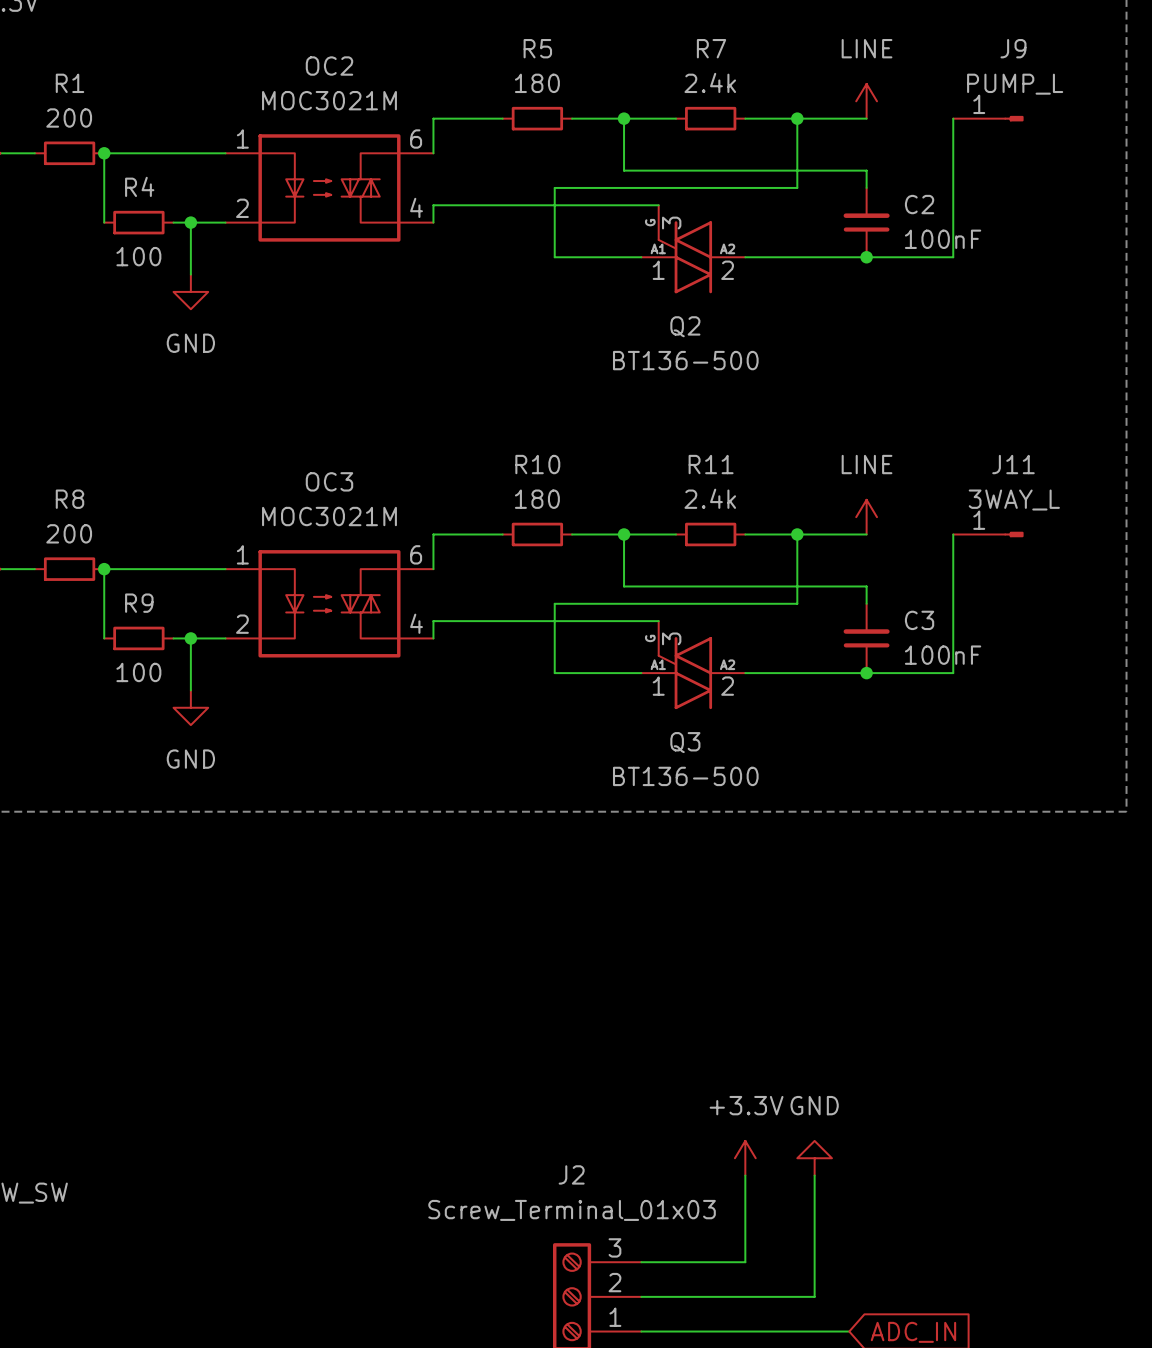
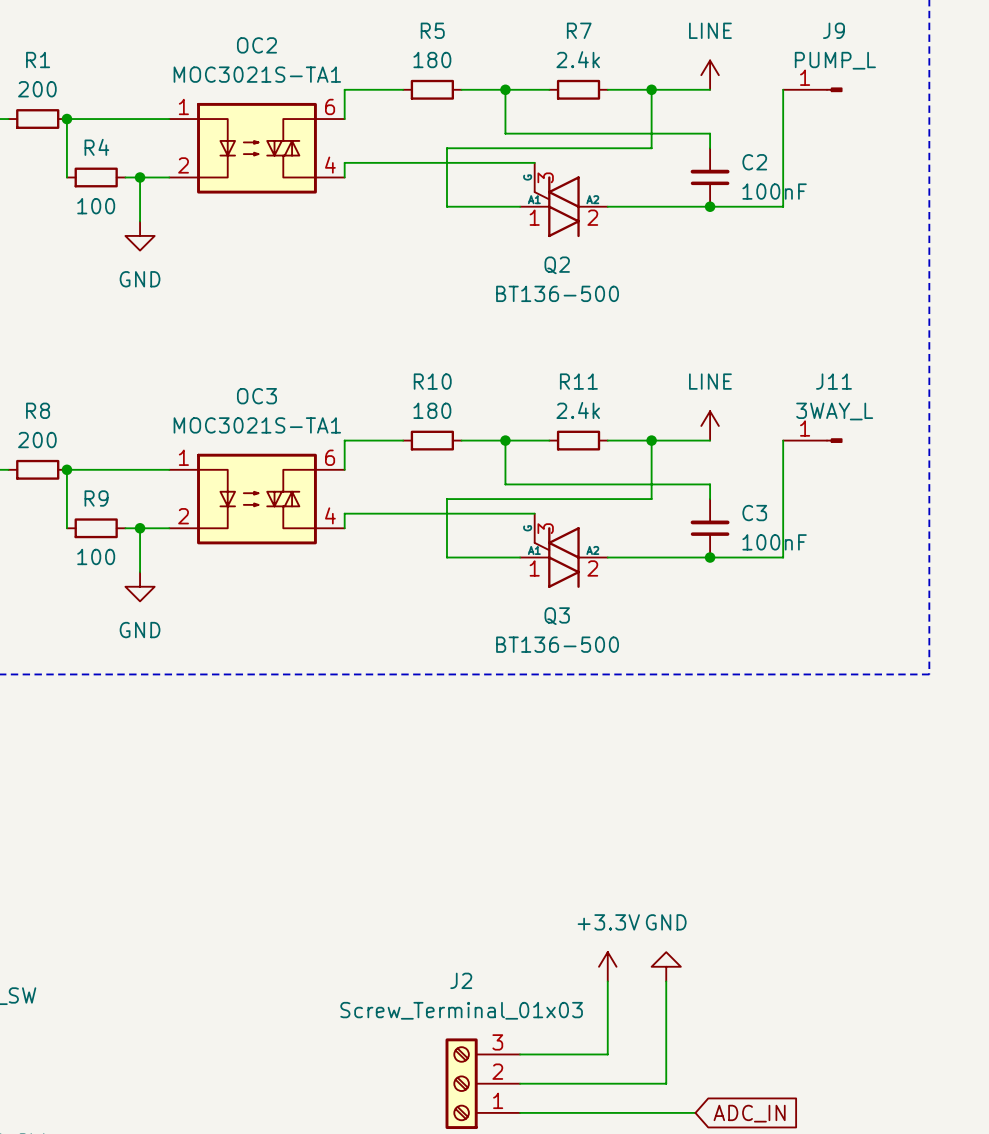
OC2 value: MOC3021M (329, 100) -> MOC3021S-TA1 (257, 74)
OC3 value: MOC3021M (329, 516) -> MOC3021S-TA1 (257, 425)

